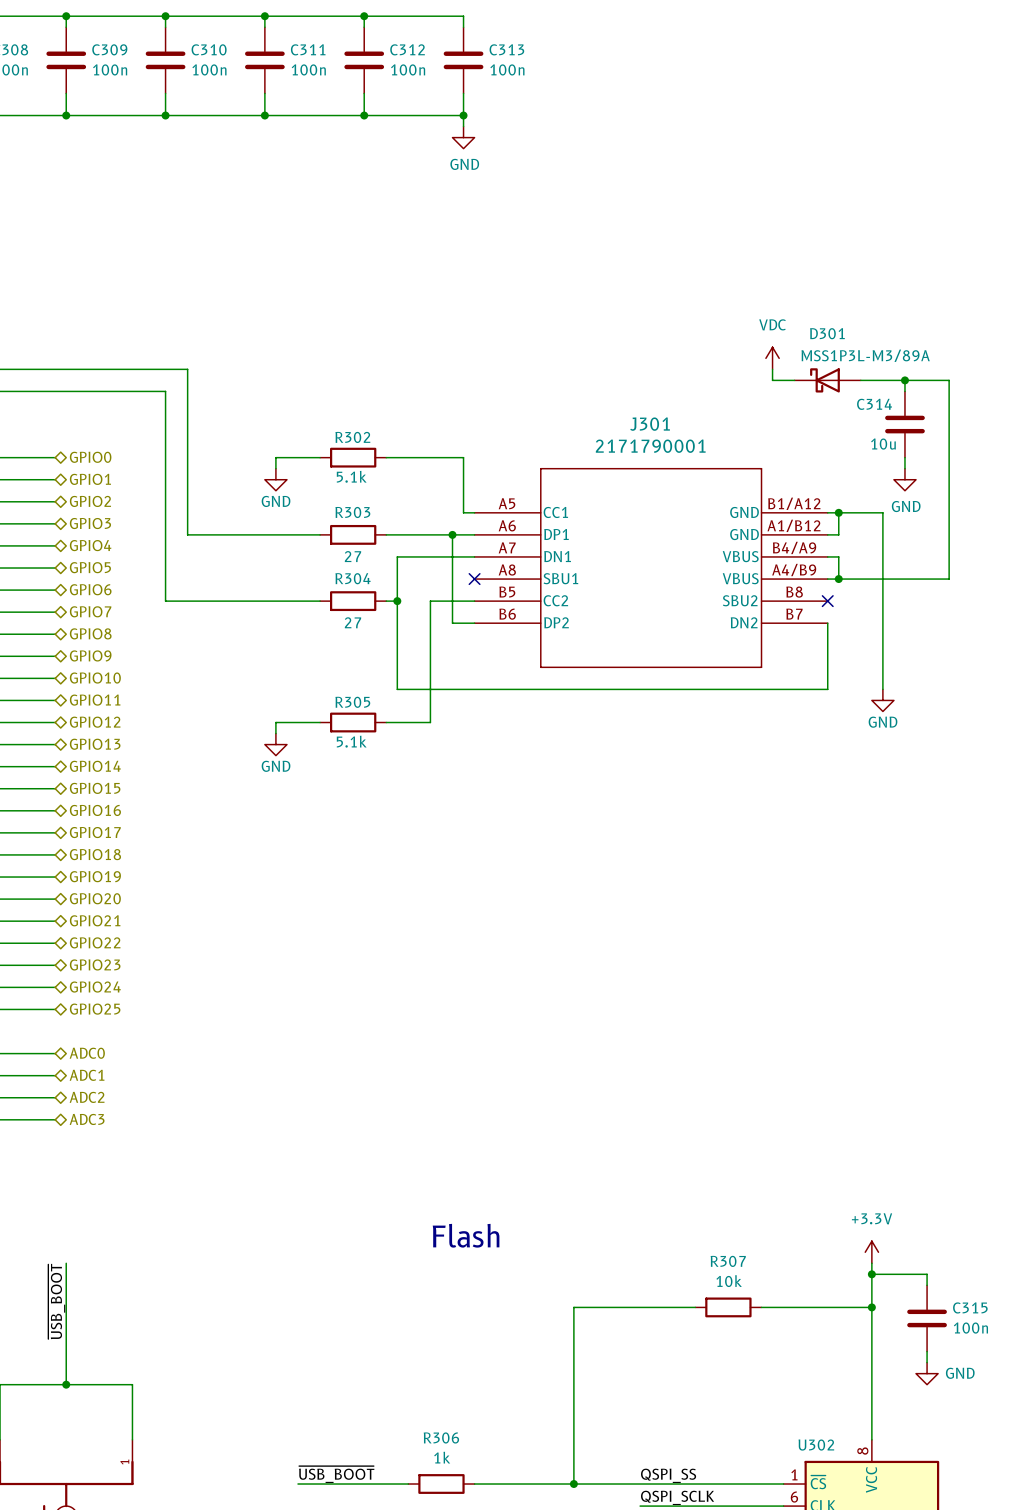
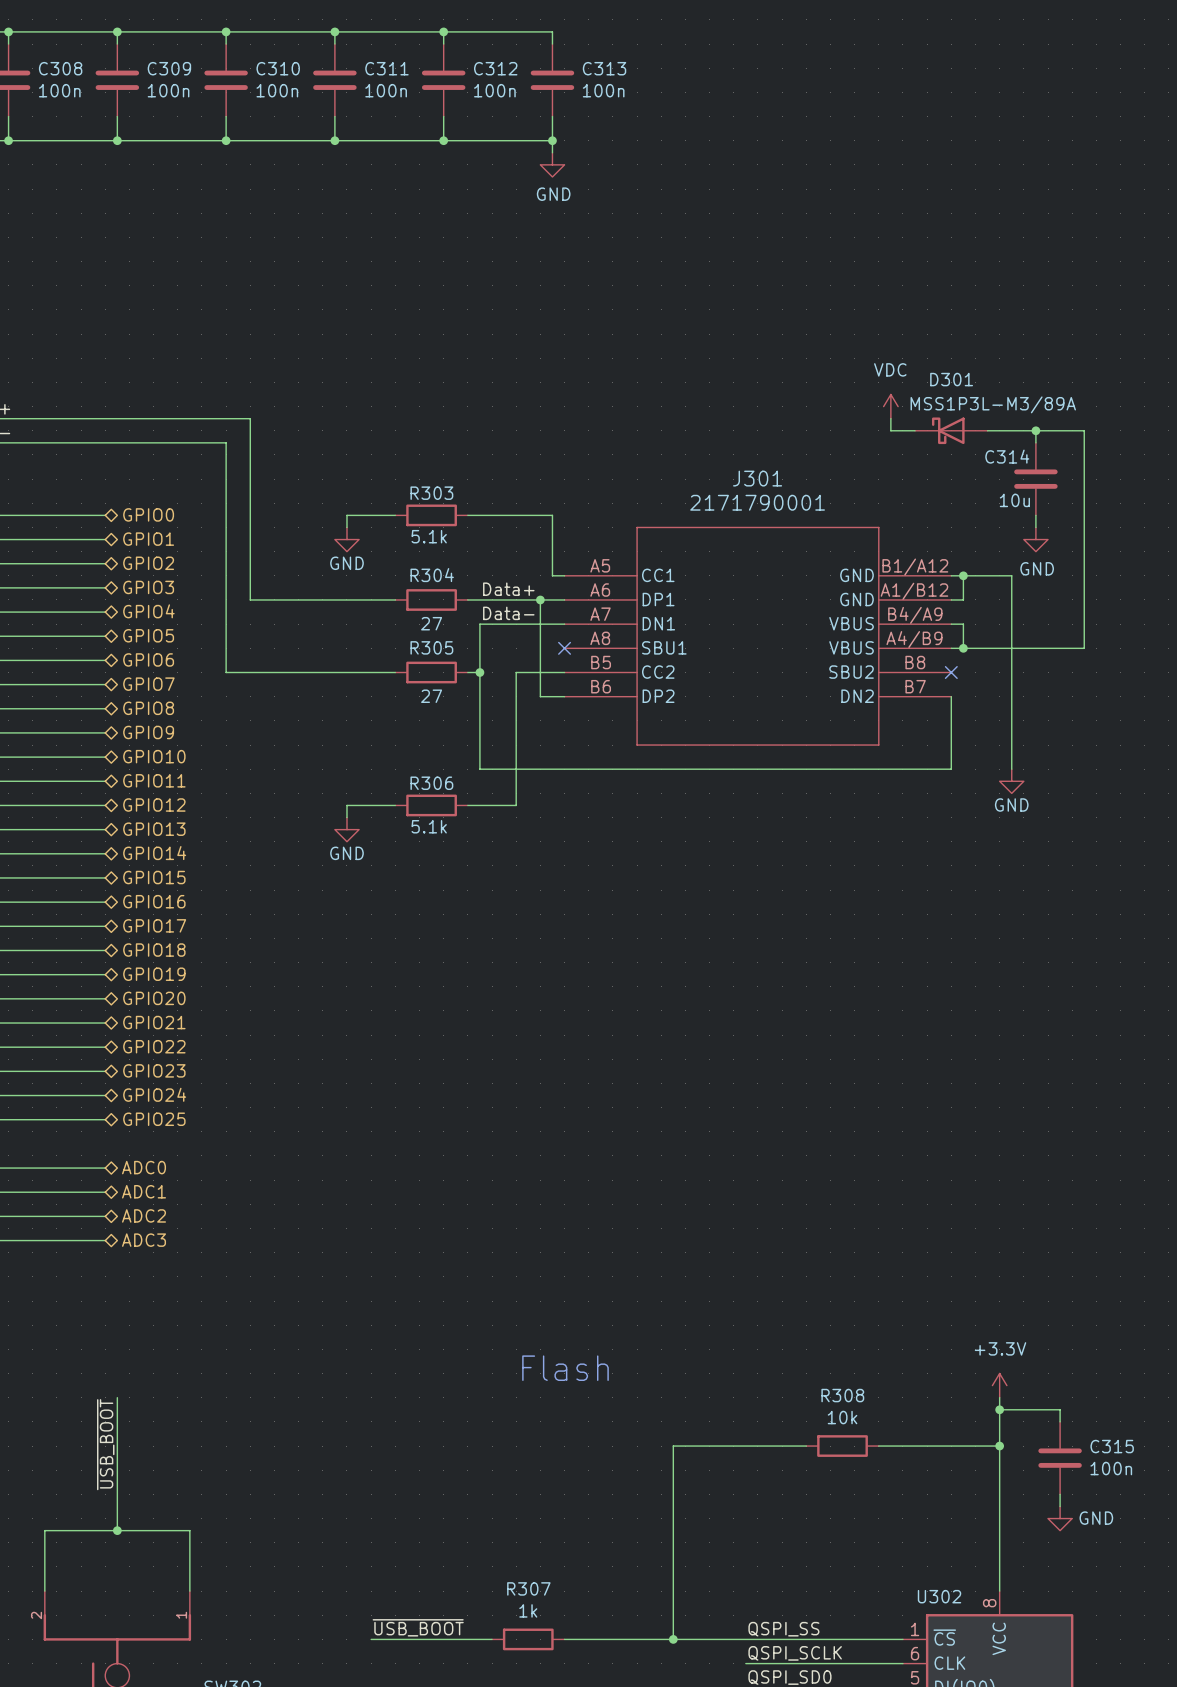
R302 name: R302 (352, 437) -> R303 (431, 493)
R303 name: R303 (352, 512) -> R304 (432, 575)
label: none -> Data+ (508, 589)
label: none -> Data- (508, 613)
R304 name: R304 (353, 578) -> R305 (431, 647)
R305 name: R305 (352, 702) -> R306 (431, 783)
R307 name: R307 (728, 1261) -> R308 (842, 1395)
R306 name: R306 (441, 1437) -> R307 (528, 1588)

